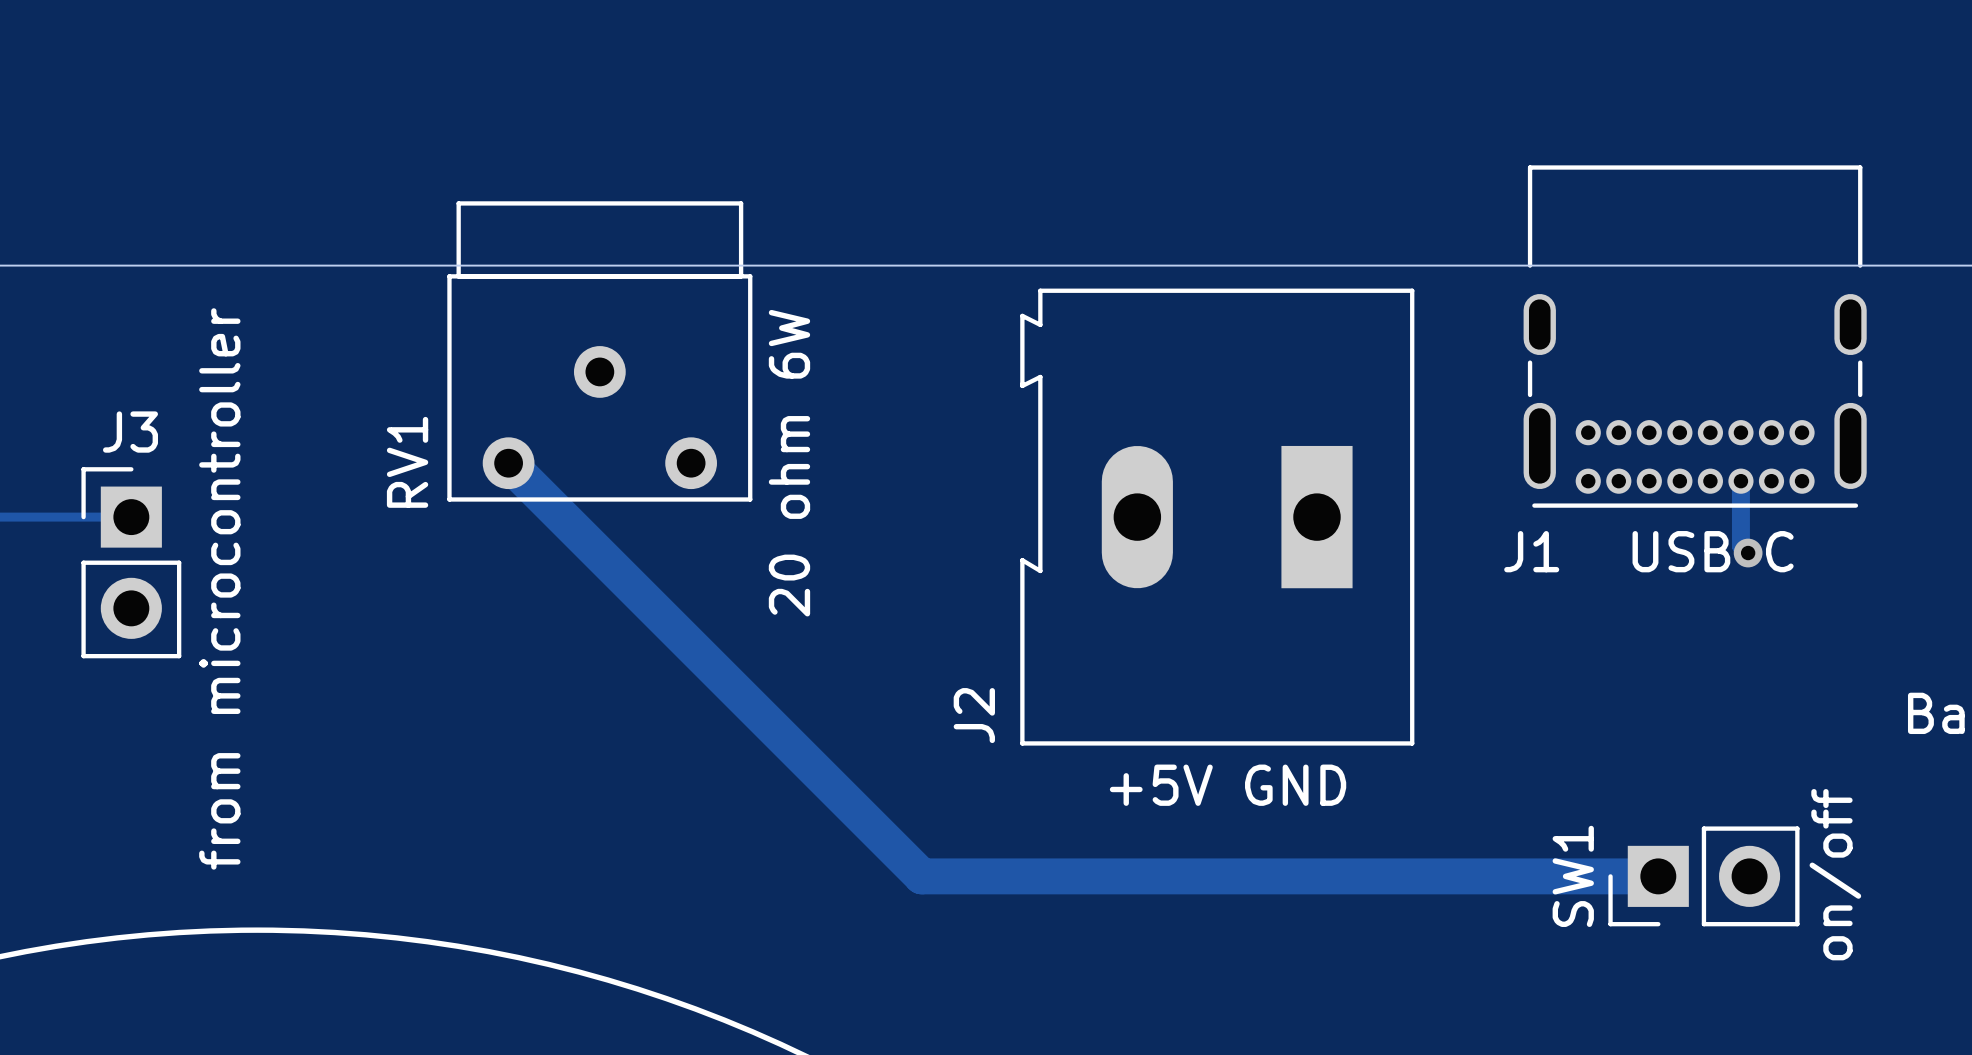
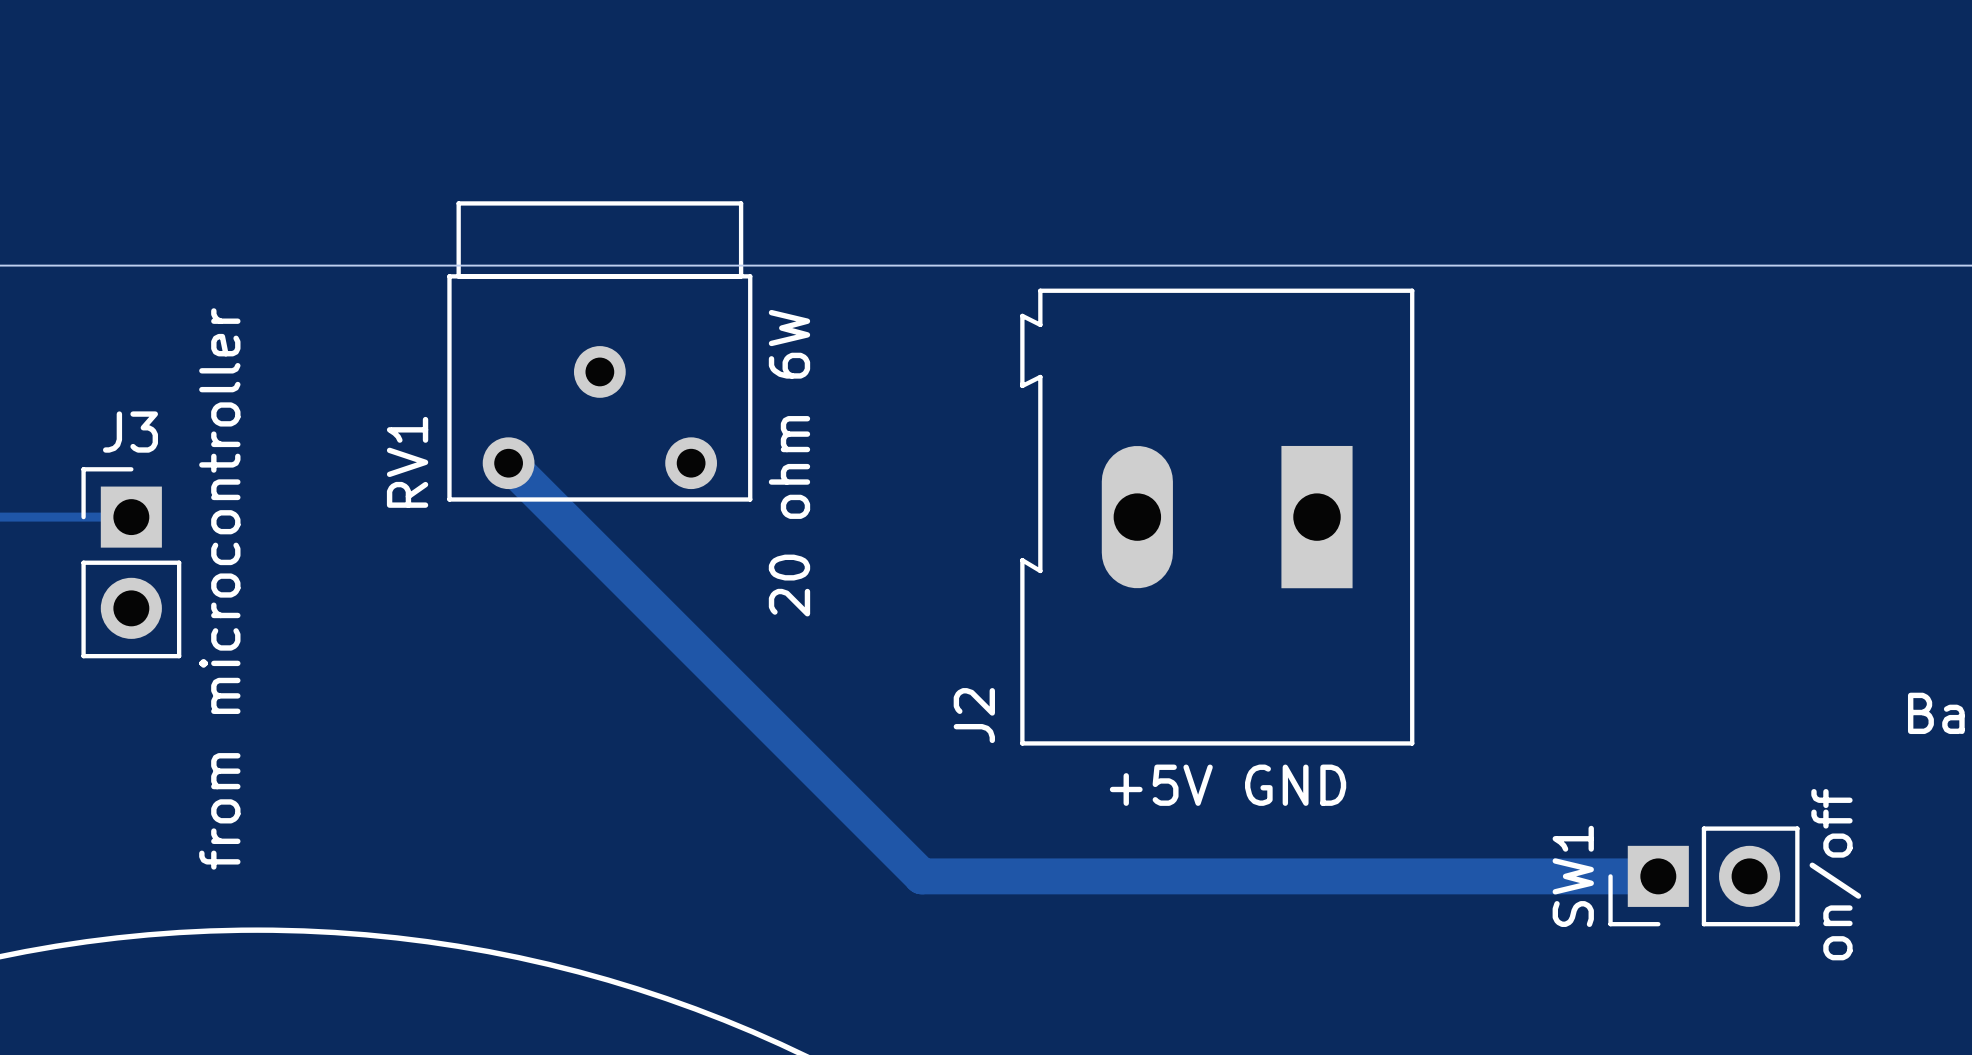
J1: USB C (1695, 336) -> none
track: (1740, 481) (1740, 545) (1748, 553) -> none
via: (1748, 553) -> none

